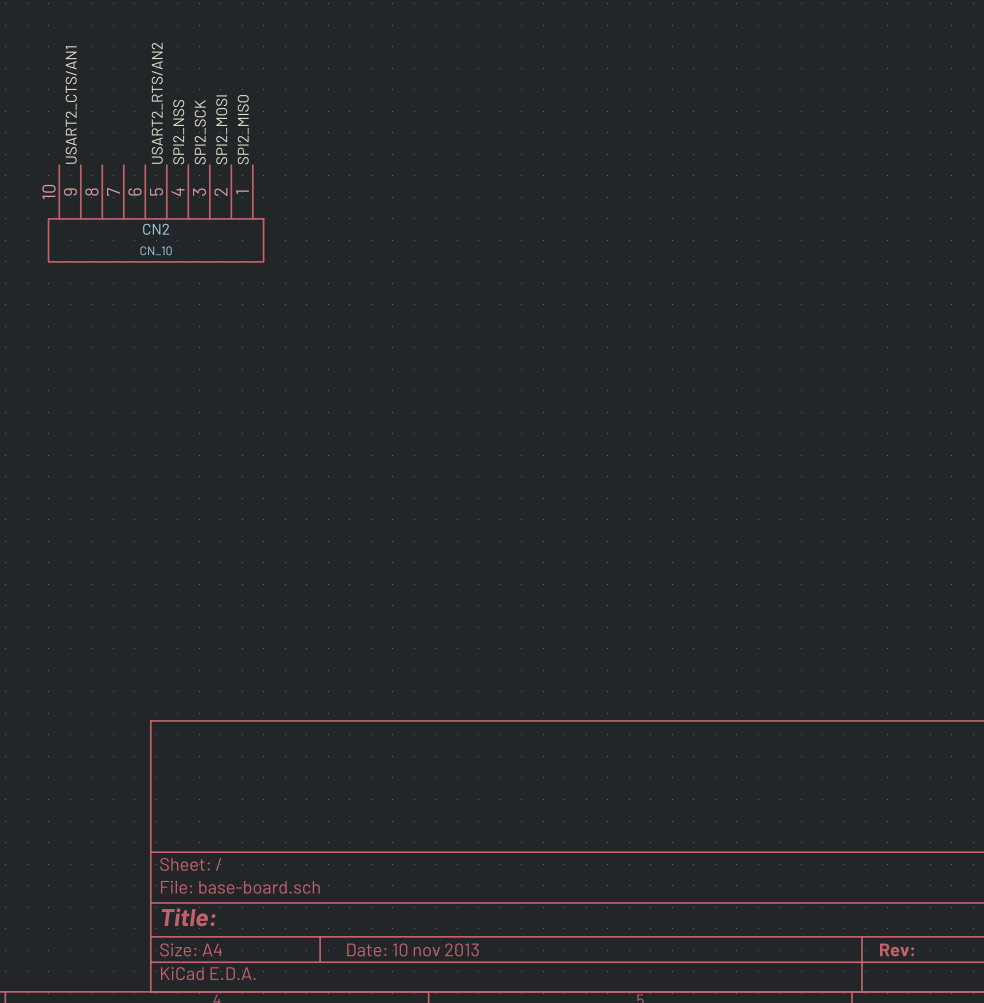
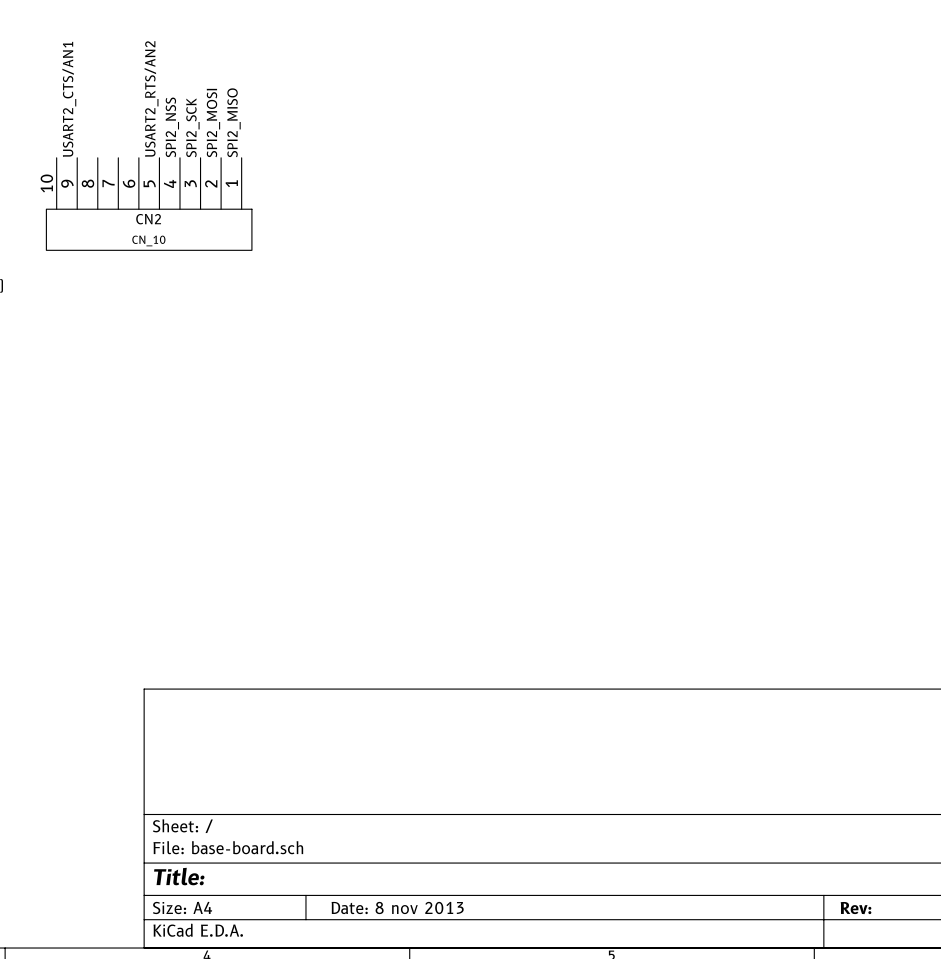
title block: Date: 10 nov 2013 (412, 949) -> Date: 8 nov 2013 (397, 907)

